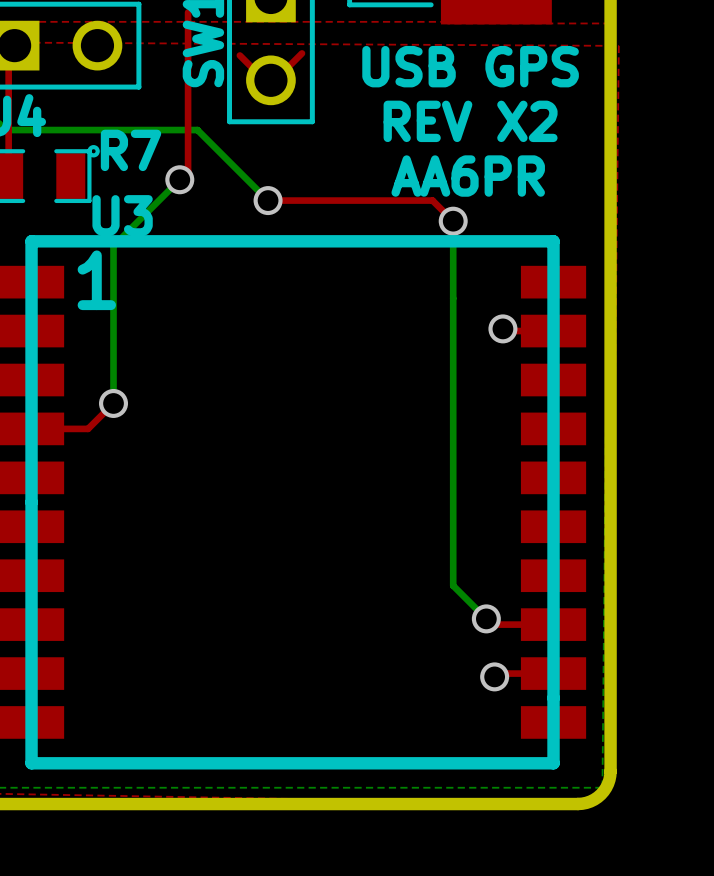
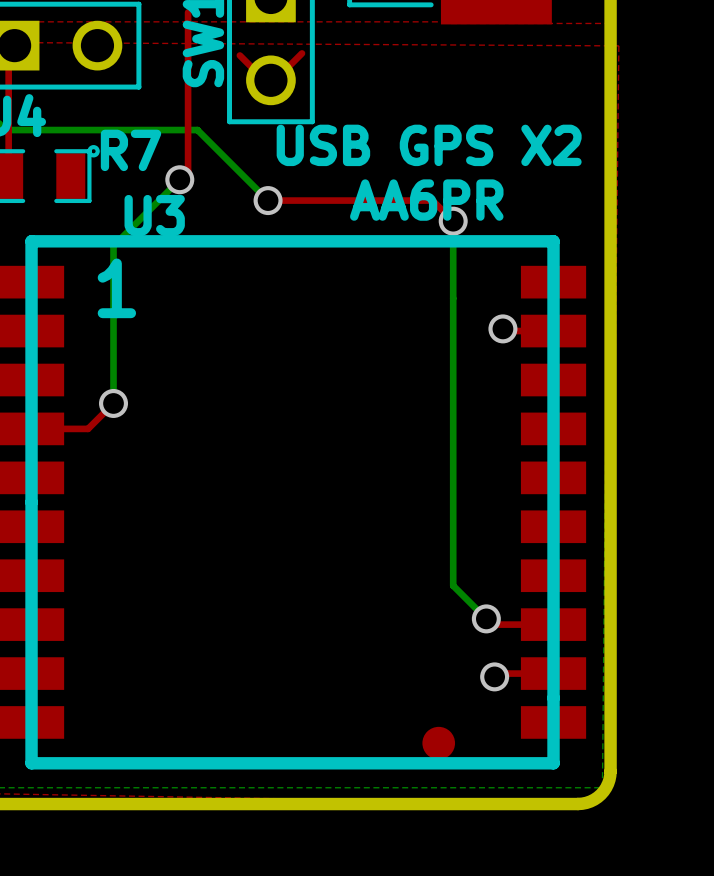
text: USB GPS (470, 66) -> none
text: REV X2 (470, 121) -> none
text: none -> USB GPS X2 (429, 145)
text position: AA6PR (468, 176) -> AA6PR (426, 200)
U3 name position: U3 (122, 215) -> U3 (154, 215)
U3 text position: 1 (96, 280) -> 1 (116, 288)
part: none -> (438, 743)

